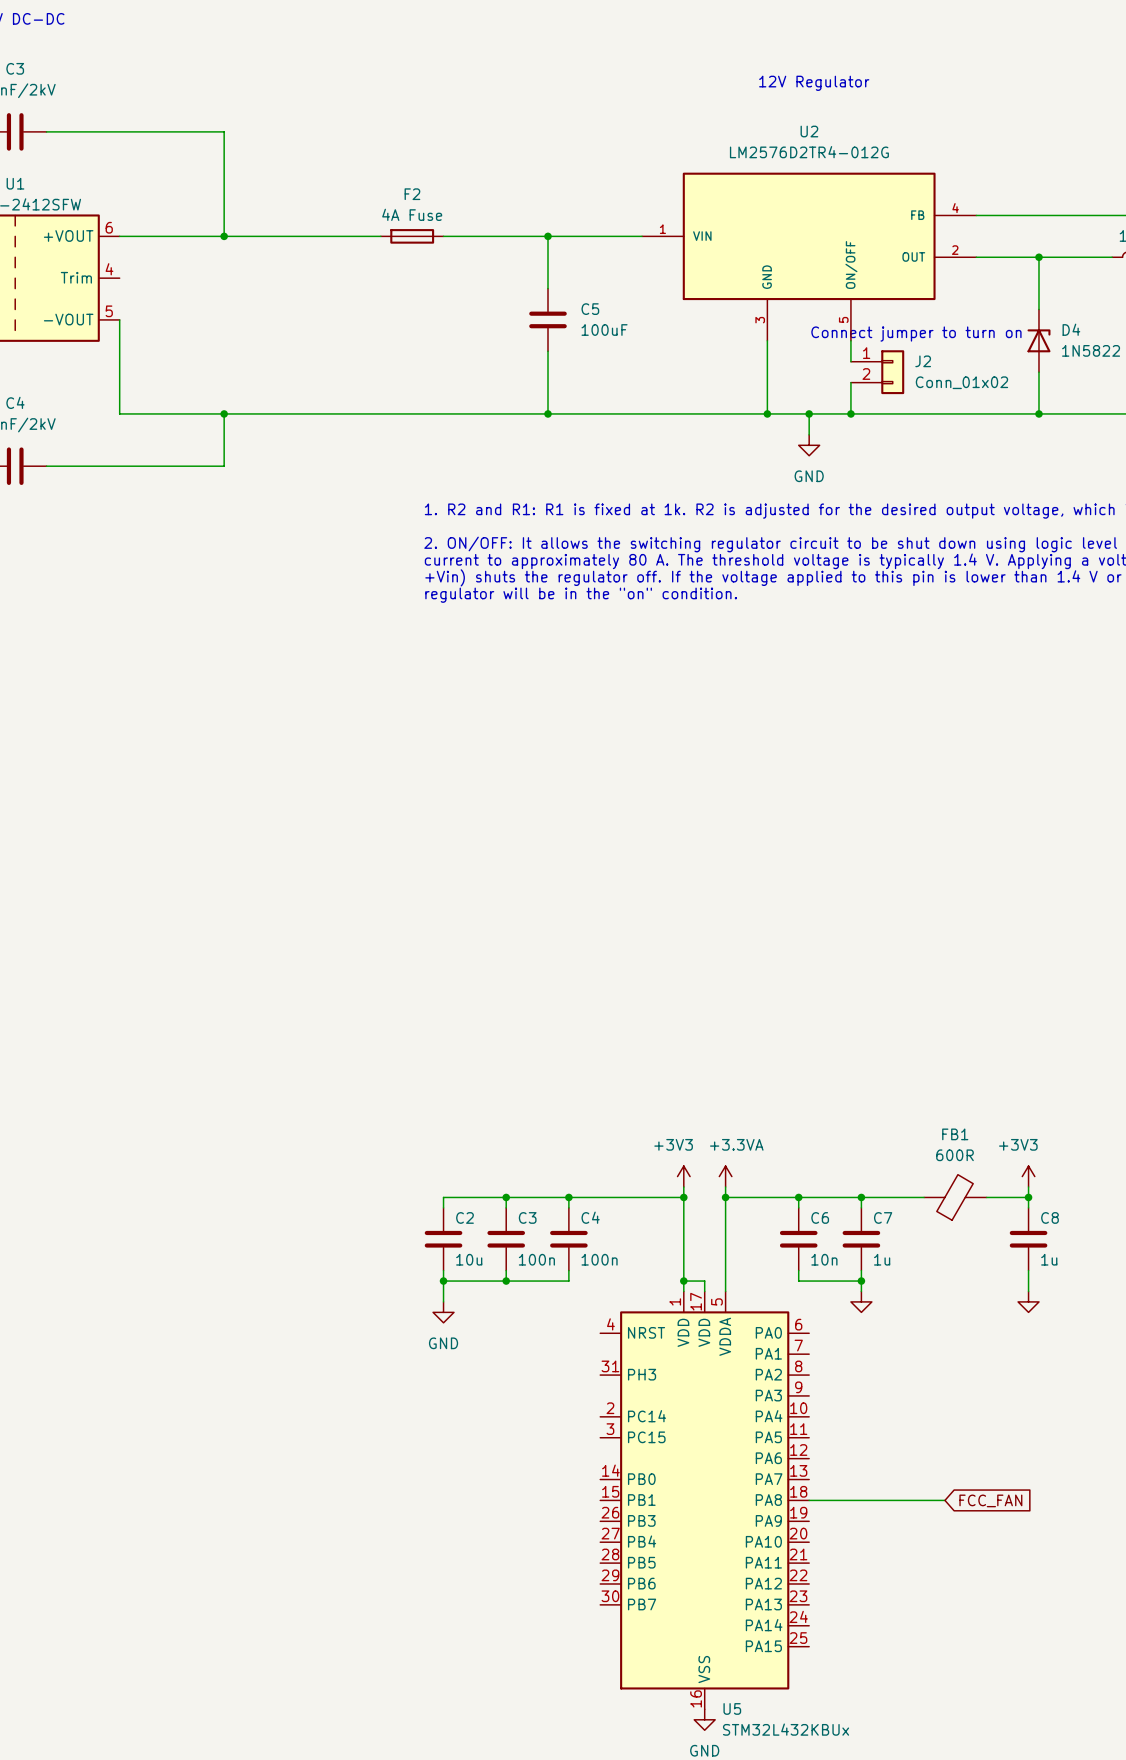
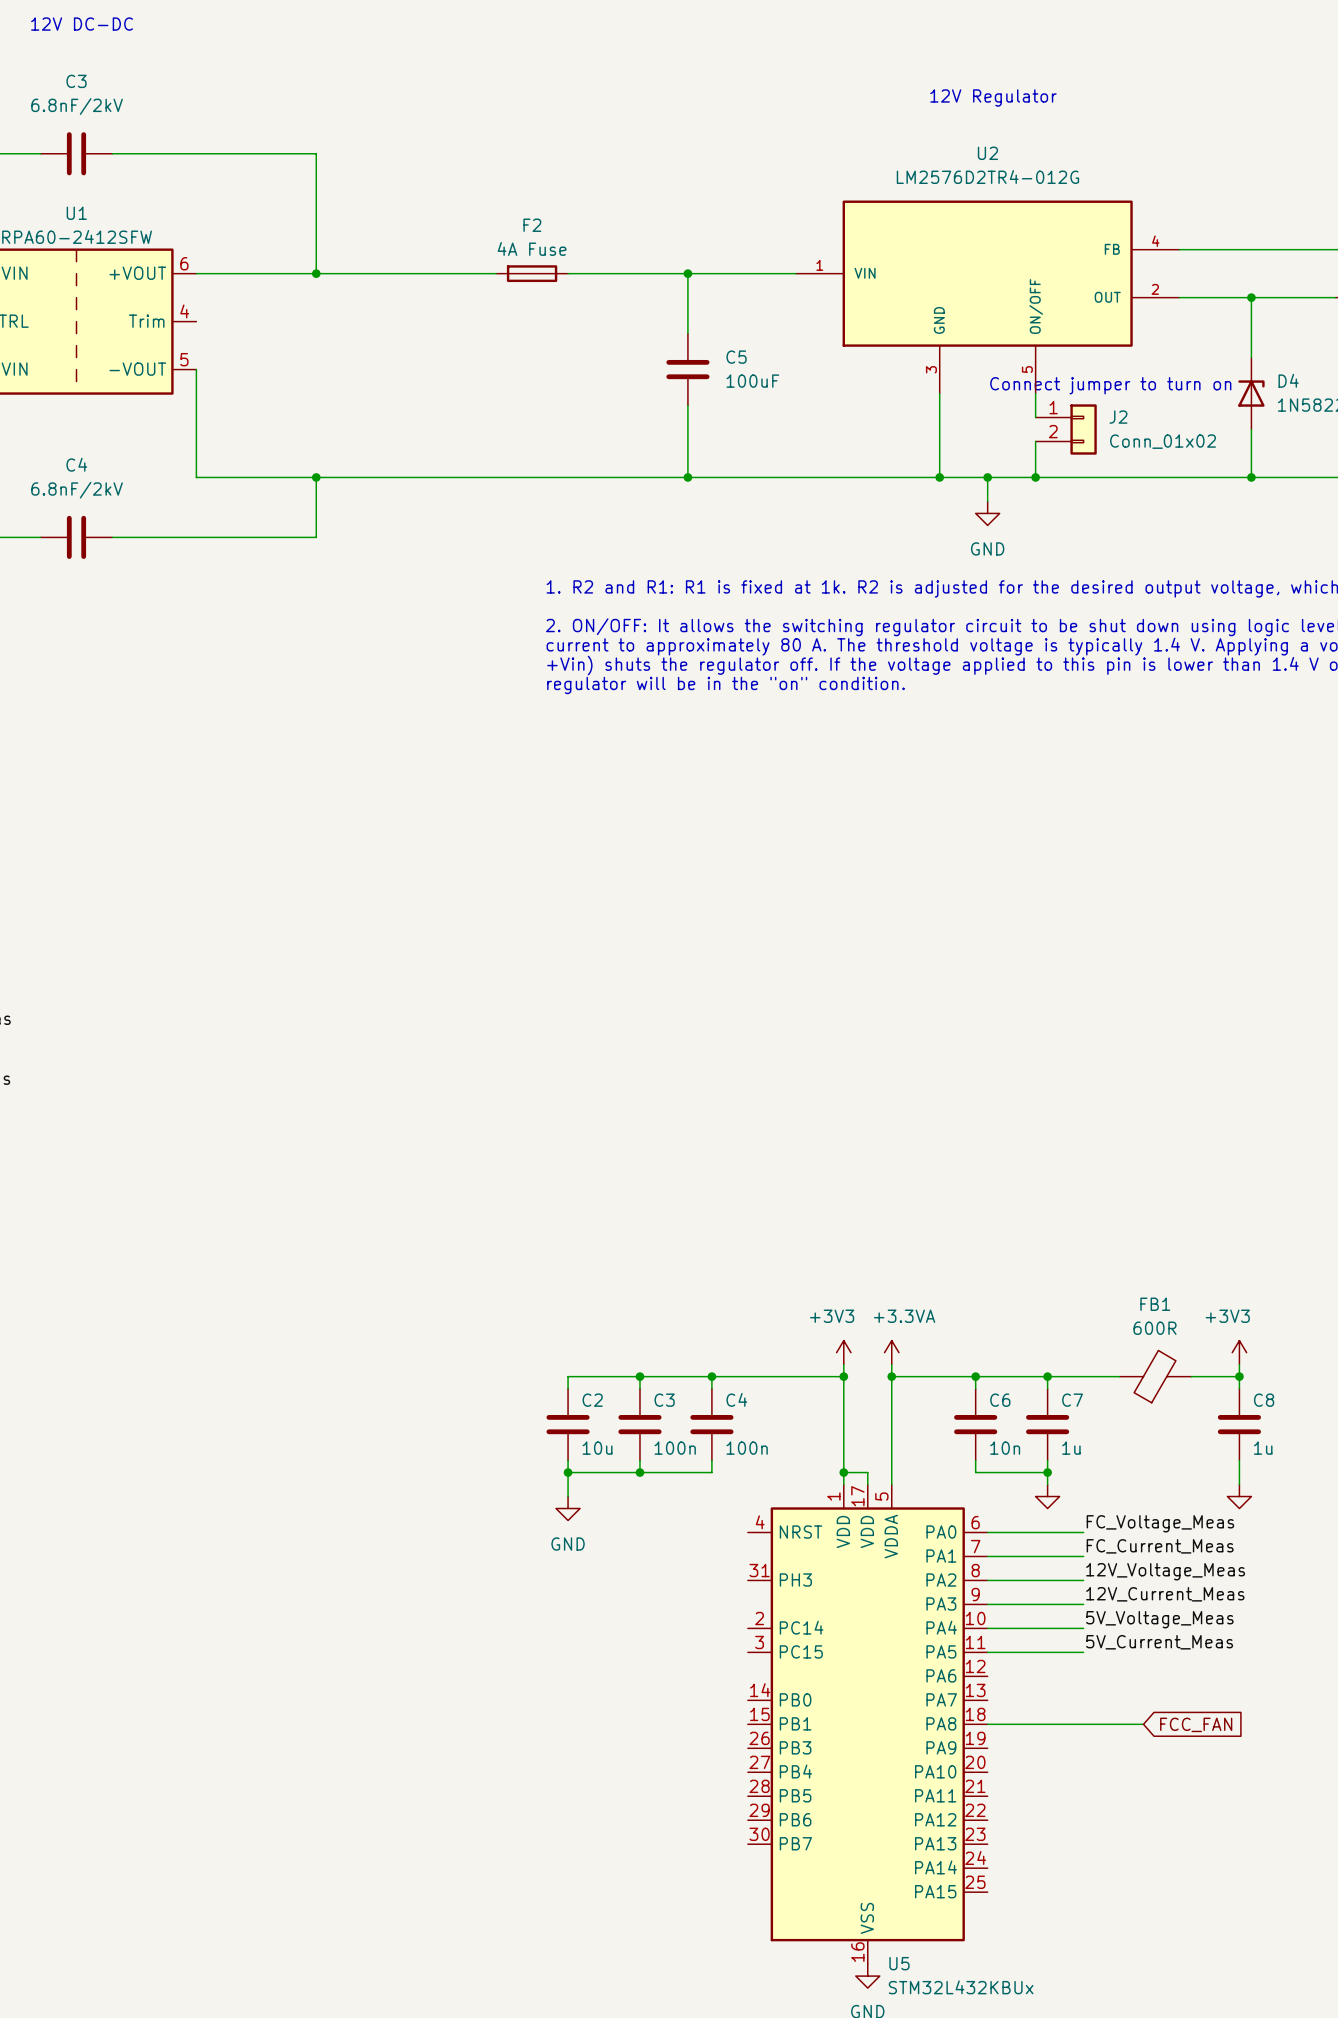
label: none -> FC_Voltage_Meas (1160, 1523)
wire: none -> (987, 1532) (1083, 1532)
label: none -> FC_Current_Meas (1160, 1546)
wire: none -> (987, 1556) (1083, 1556)
label: none -> 12V_Voltage_Meas (1165, 1571)
wire: none -> (987, 1580) (1083, 1580)
label: none -> 12V_Current_Meas (1165, 1594)
wire: none -> (987, 1604) (1083, 1604)
label: none -> 5V_Voltage_Meas (1159, 1619)
wire: none -> (987, 1628) (1083, 1628)
label: none -> 5V_Current_Meas (1159, 1642)
wire: none -> (987, 1652) (1083, 1652)

